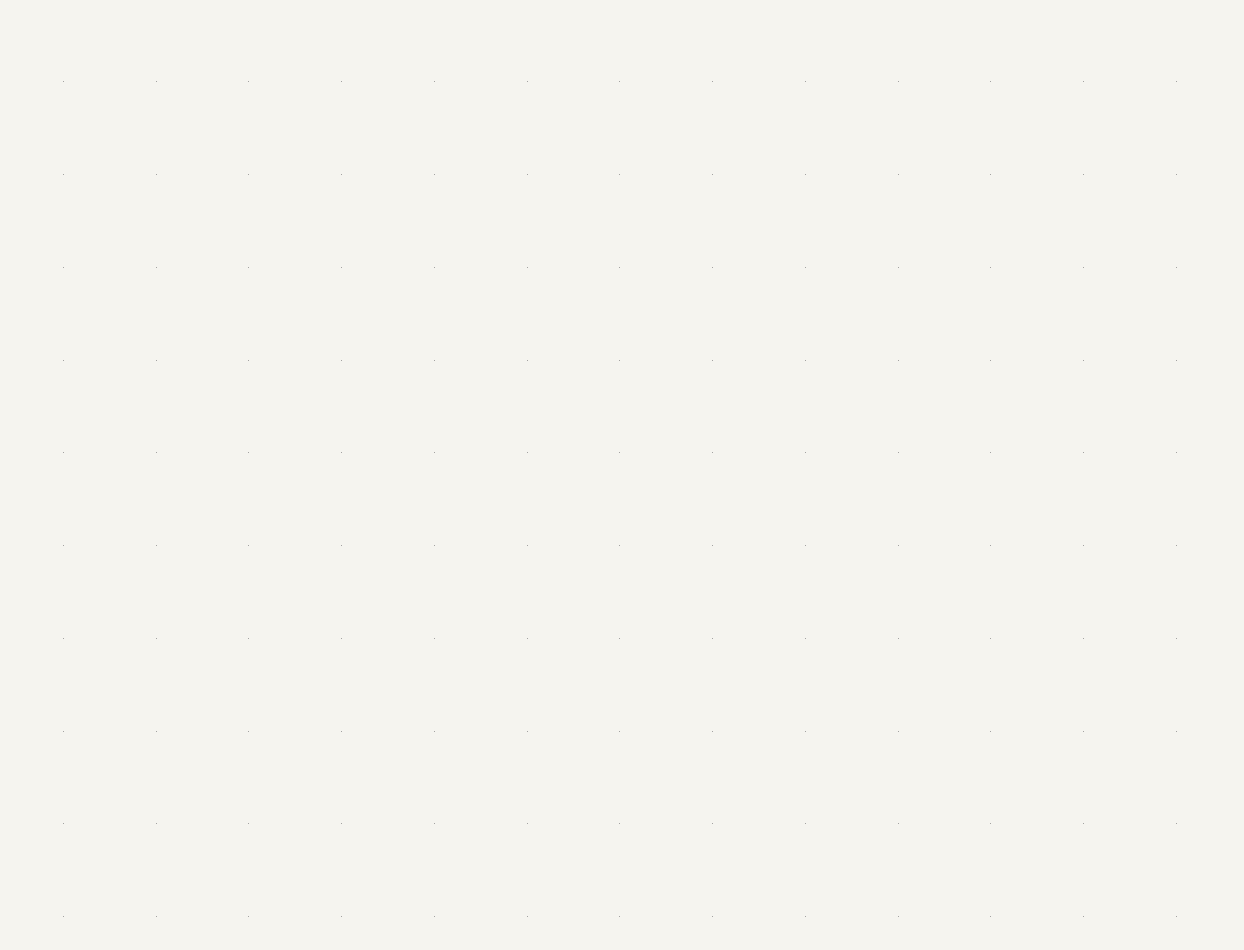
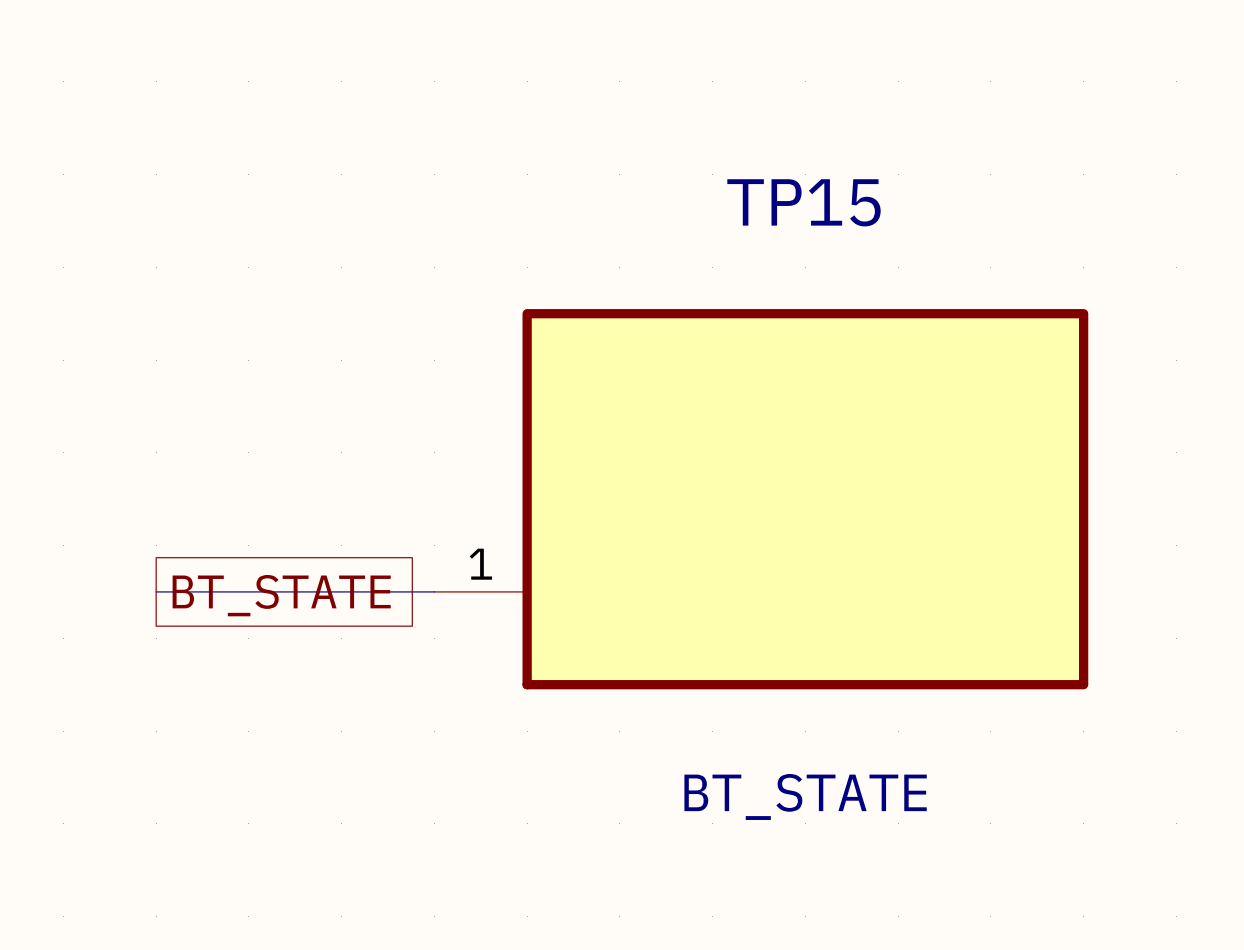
TP15: none -> BT_STATE (761, 499)
wire: none -> (156, 591) (434, 591)
global label: none -> BT_STATE (281, 595)

